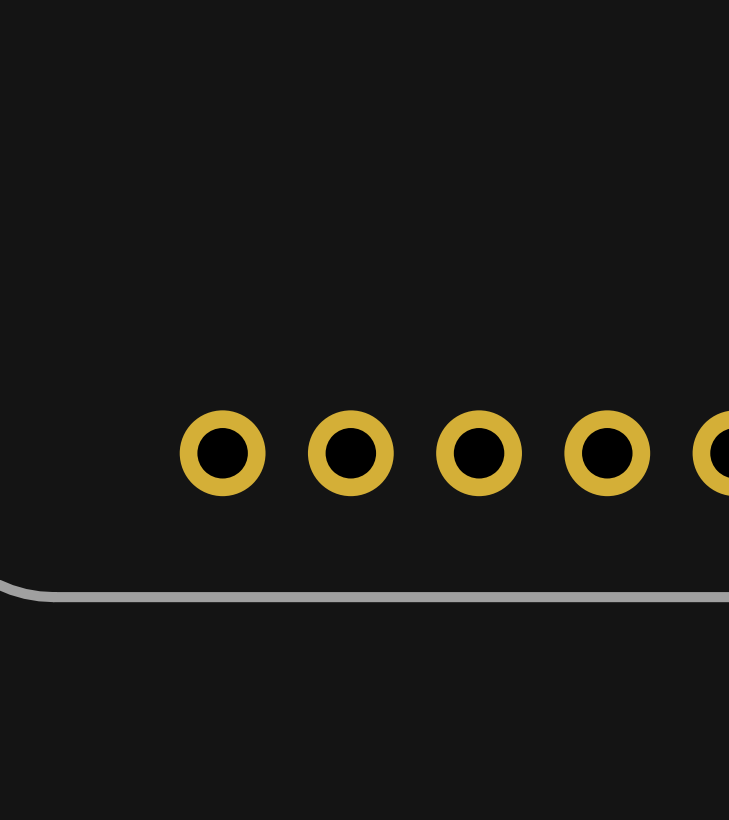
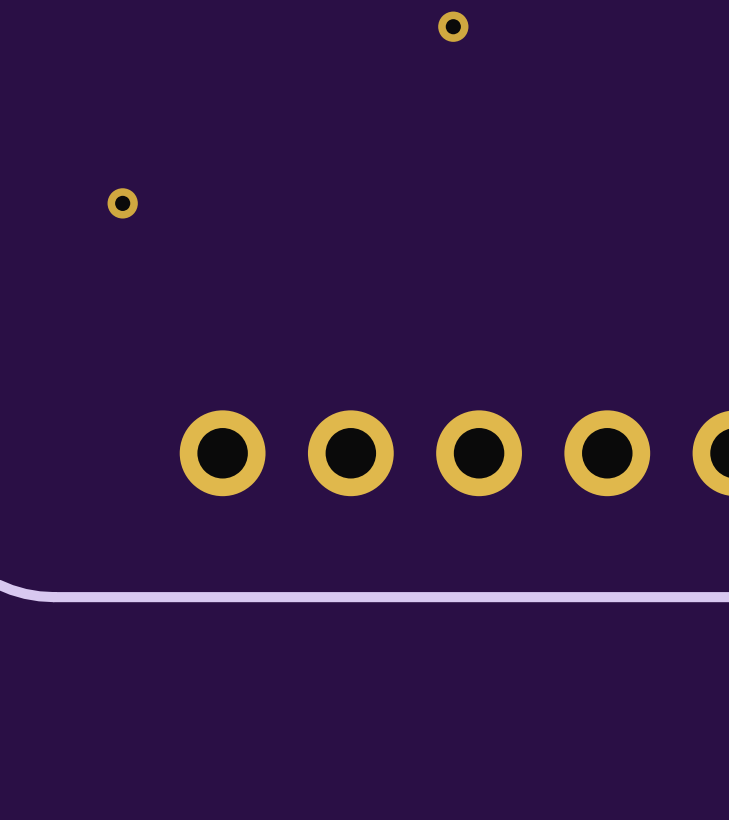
via: none -> (453, 26)
via: none -> (122, 203)

